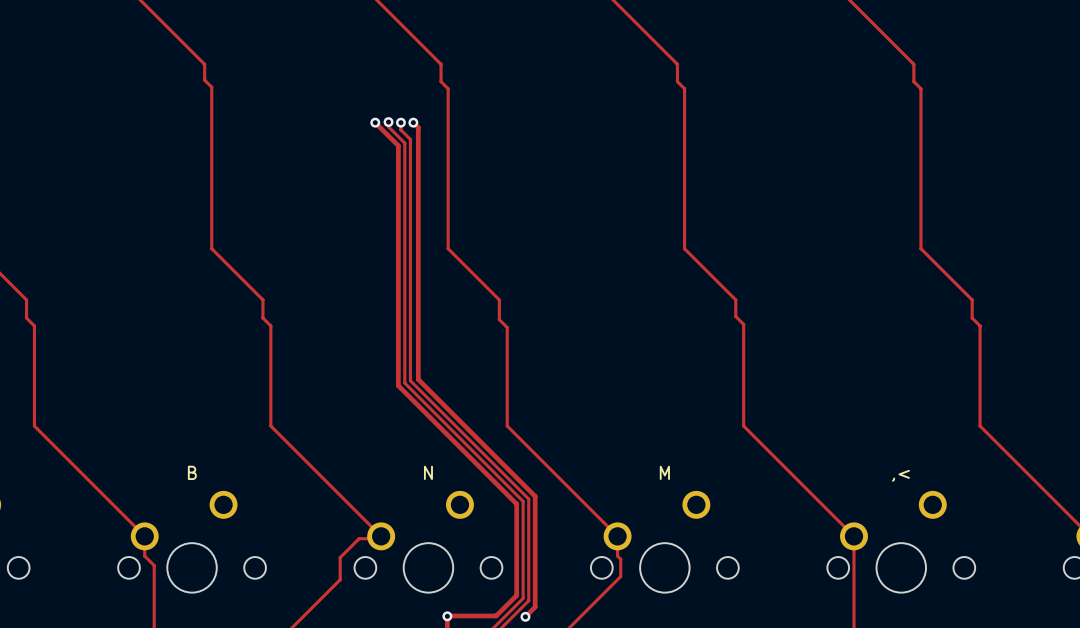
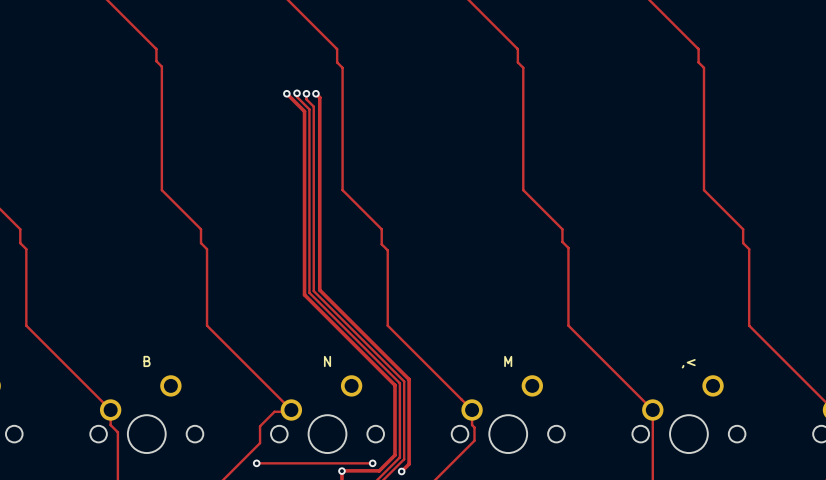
track: none -> (256, 463) (372, 463)
via: none -> (256, 463)
via: none -> (372, 463)

